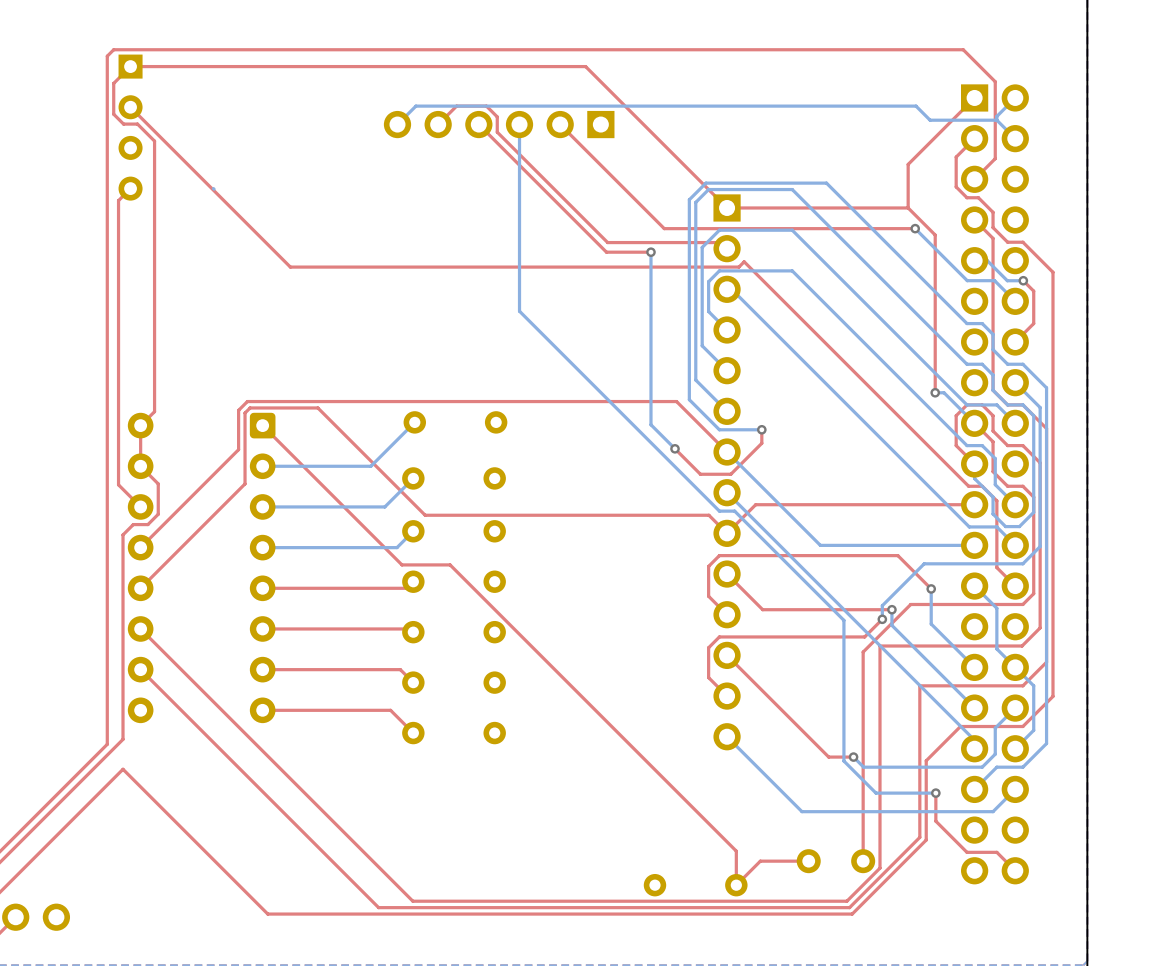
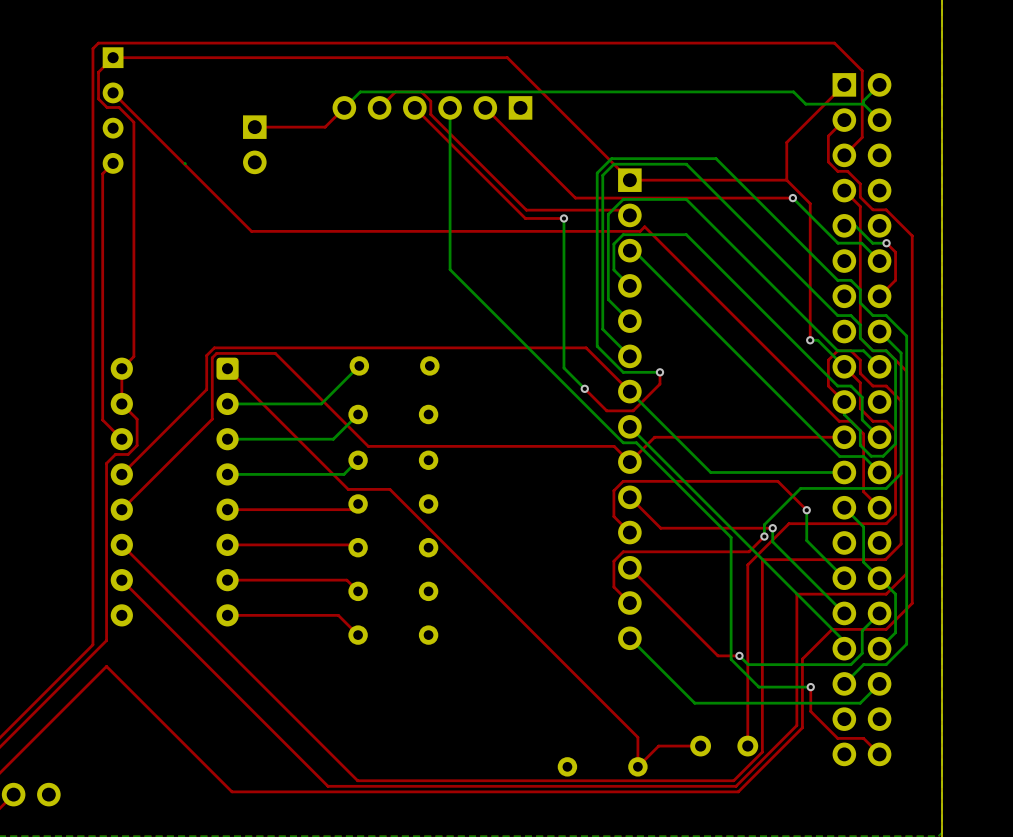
top track: none -> (344, 107) (325, 127) (254, 127)
part: none -> (254, 144)

